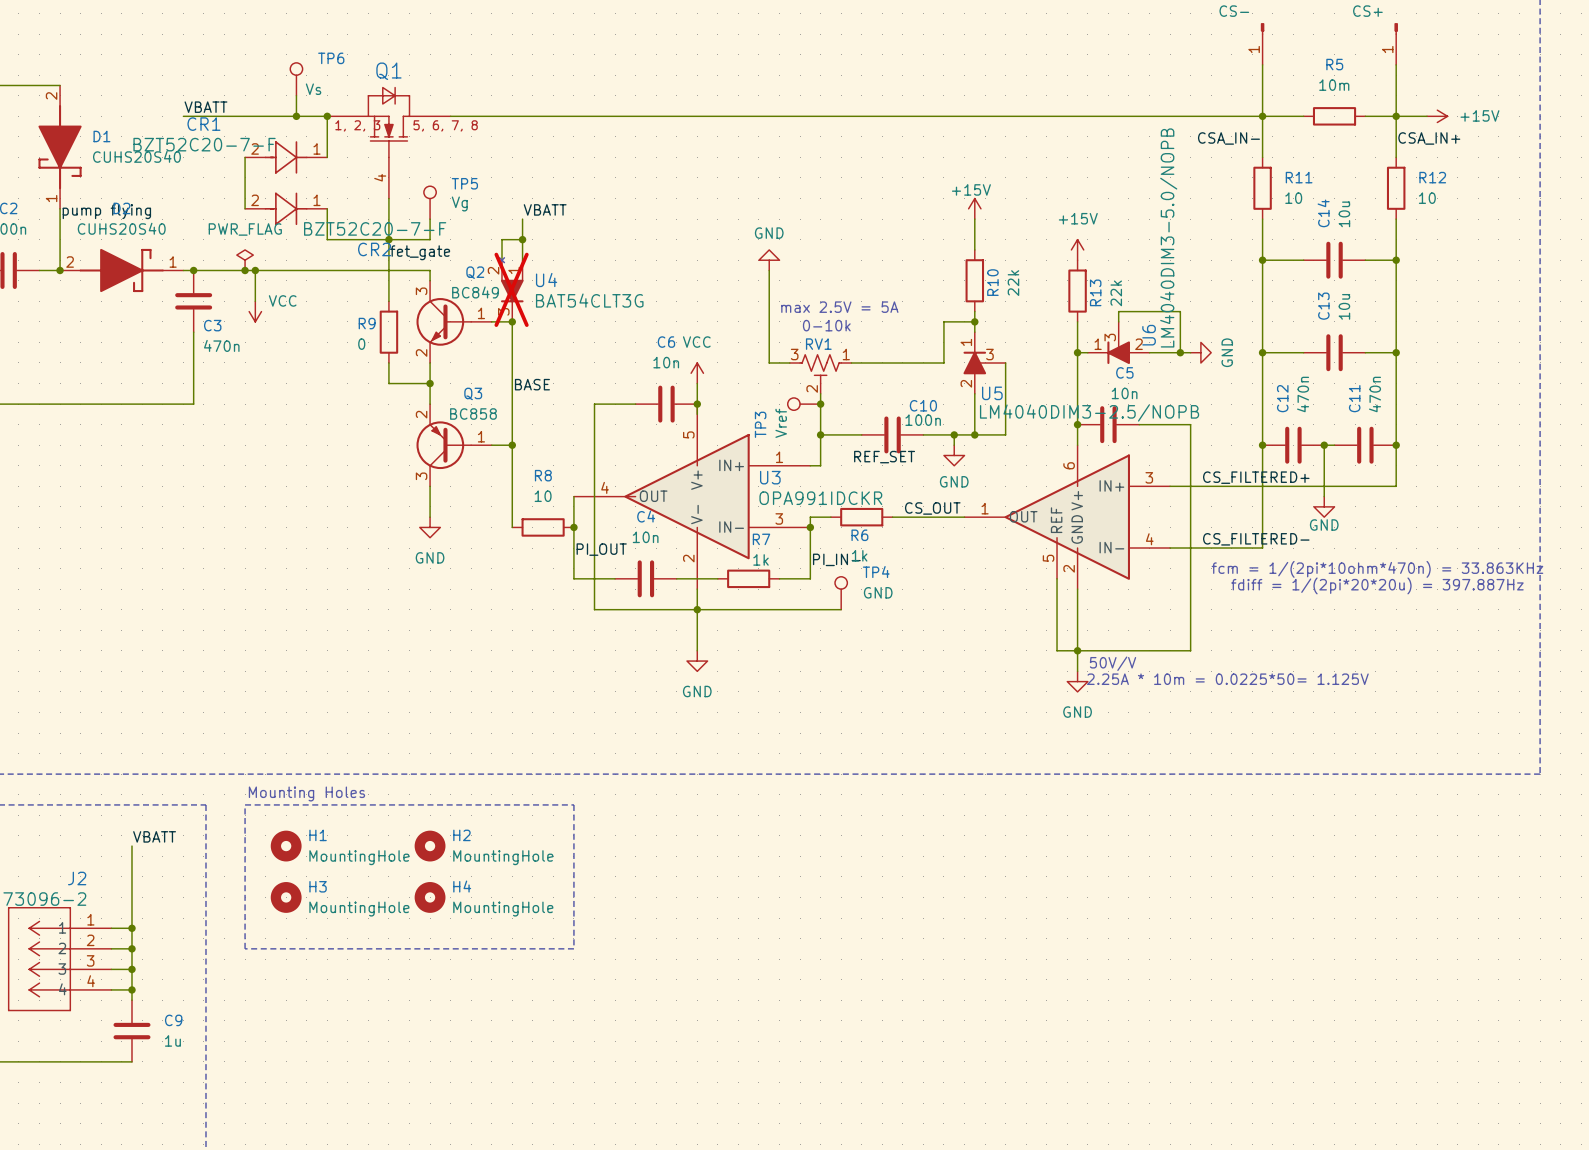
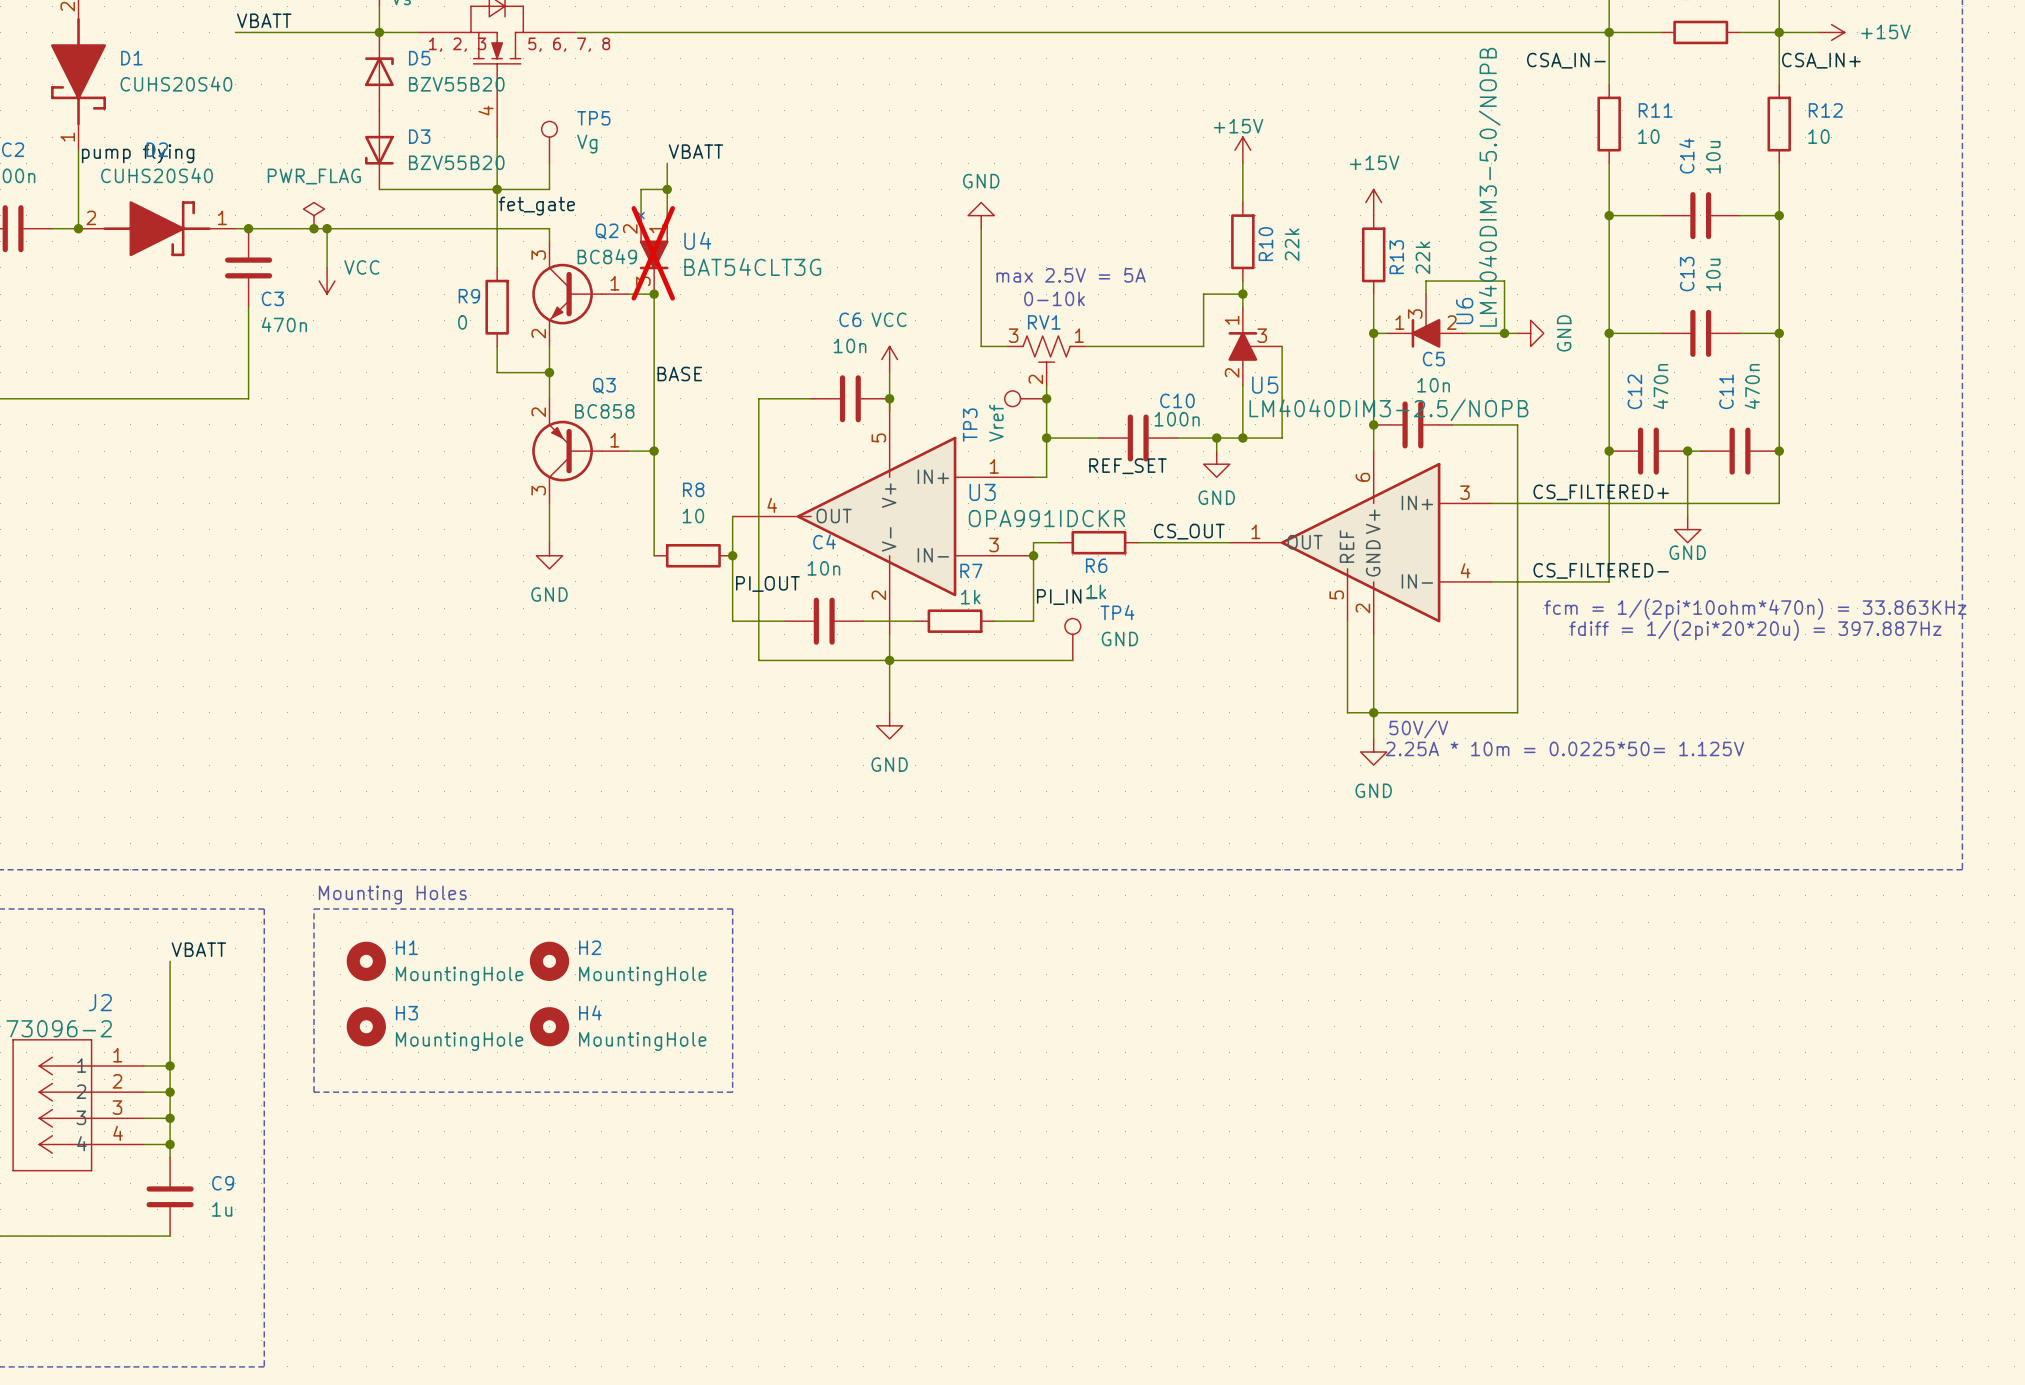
wire: (327, 116) (327, 157) -> none
junction: (327, 116) -> none
D5: none -> BZV55B20 (379, 71)
wire: (245, 157) (245, 208) -> none
CR1: BZT52C20-7-F (286, 157) -> none
CR2: BZT52C20-7-F (286, 208) -> none
D3: none -> BZV55B20 (379, 150)
wire: (327, 208) (327, 239) -> (379, 189) (418, 189)

